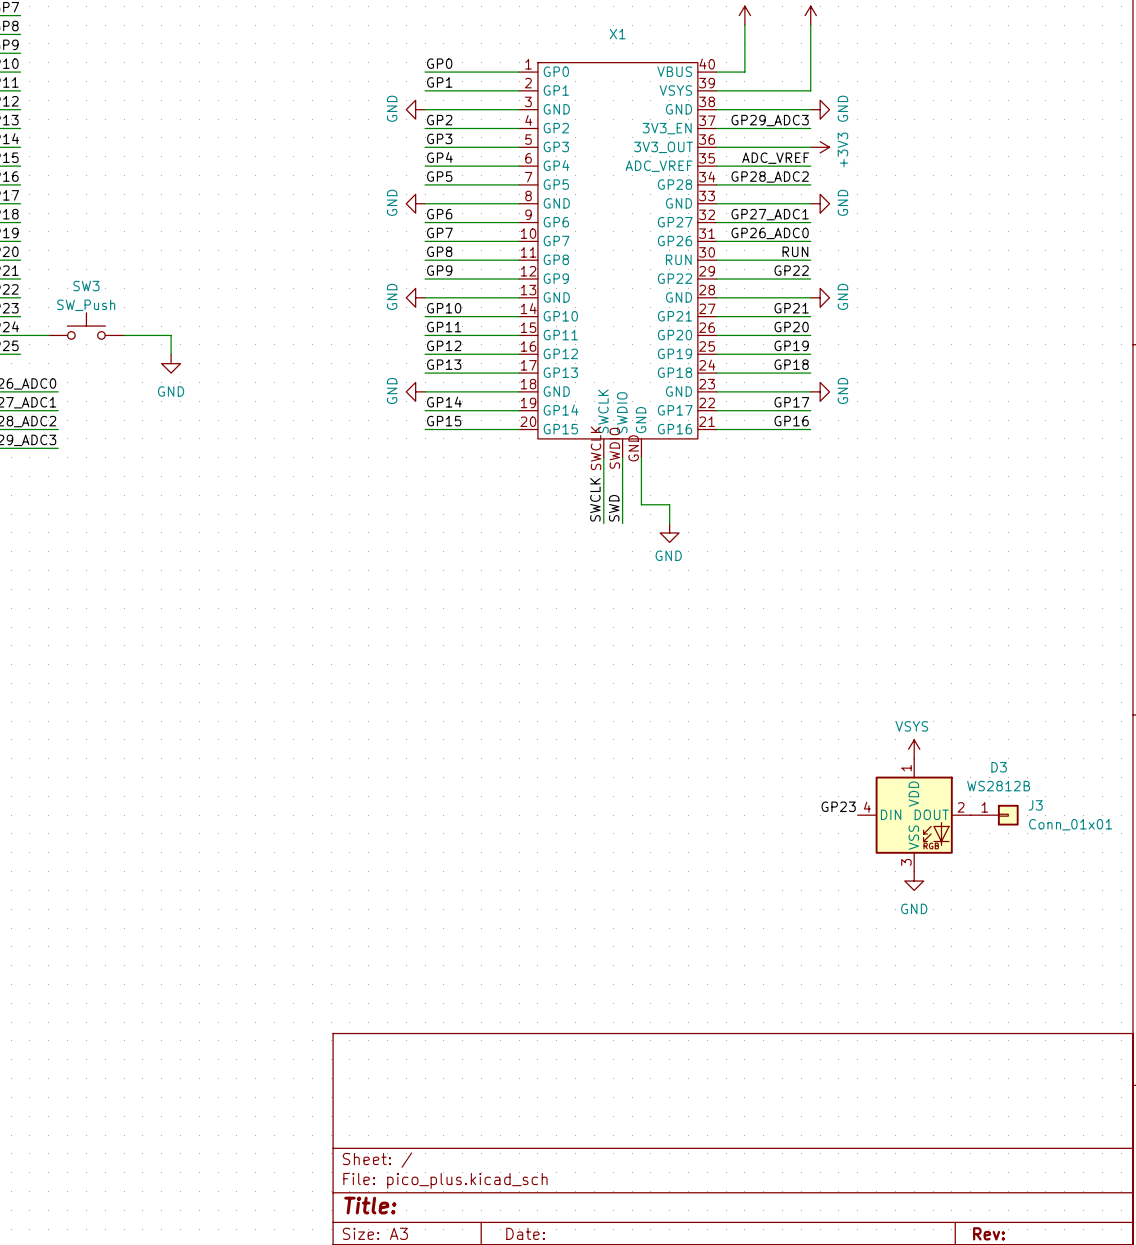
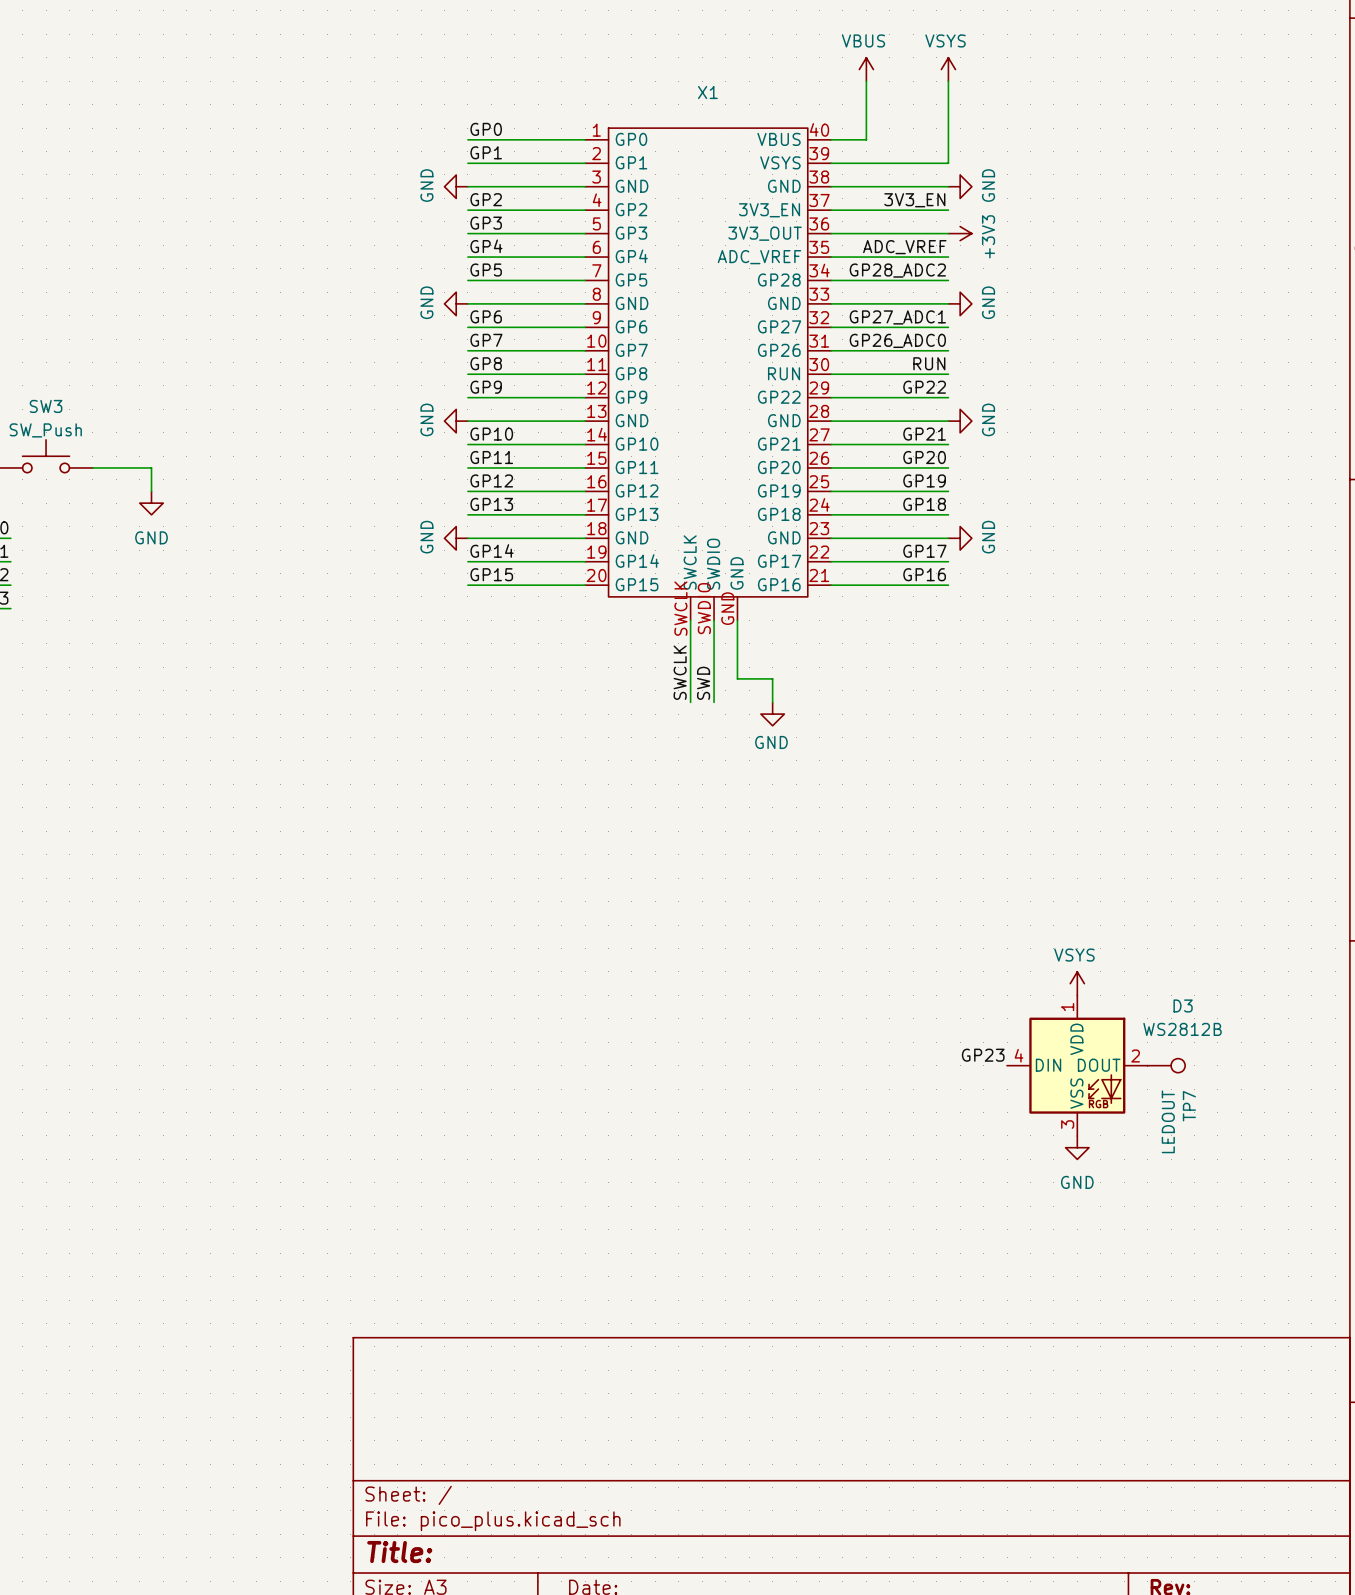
label: GP29_ADC3 (770, 120) -> 3V3_EN (914, 200)
TP7: none -> LEDOUT (1166, 1065)
J3: Conn_01x01 (994, 815) -> none

